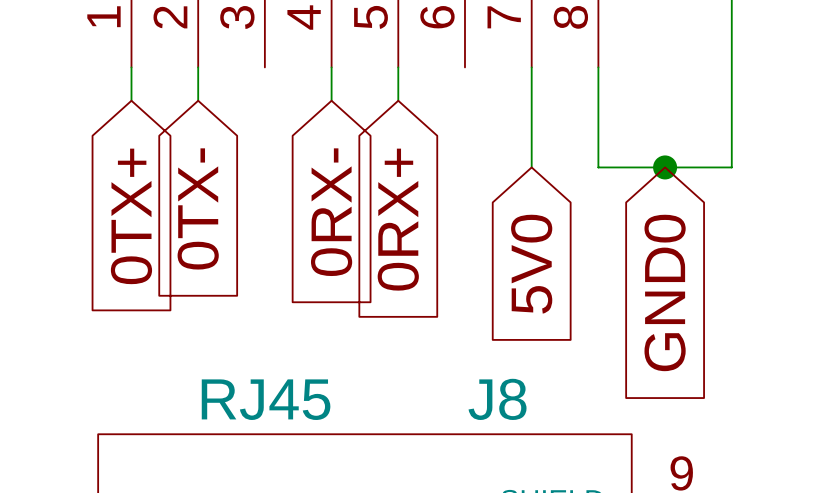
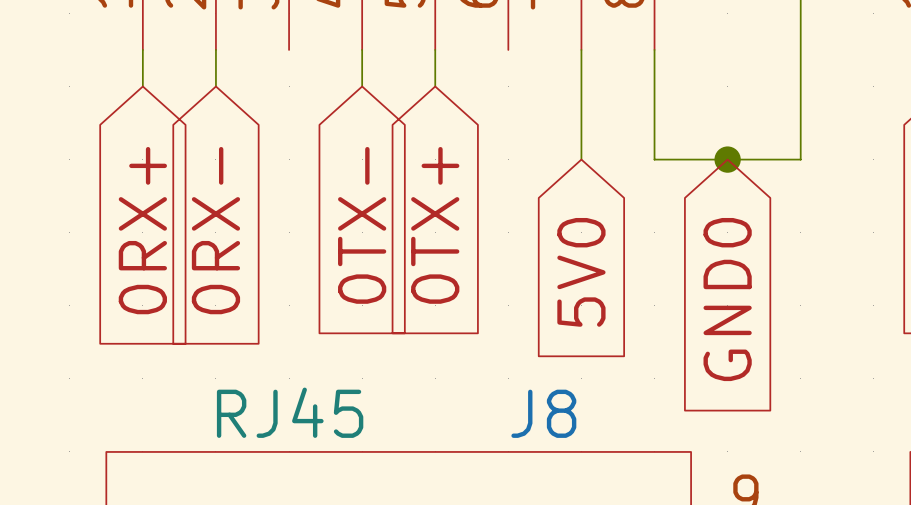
global label: 0TX- (198, 208) -> 0RX- (215, 230)
global label: 0RX- (331, 212) -> 0TX- (362, 225)
global label: 0TX+ (131, 216) -> 0RX+ (142, 230)
global label: 0RX+ (398, 219) -> 0TX+ (435, 225)

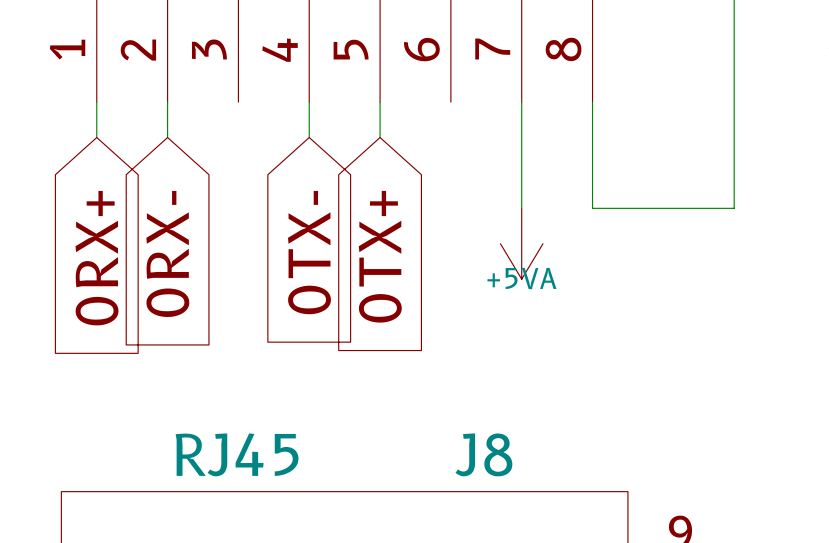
junction: (727, 159) -> none
power symbol: none -> +5VA (521, 243)
global label: 5V0 (581, 272) -> none
global label: GND0 (727, 299) -> none

